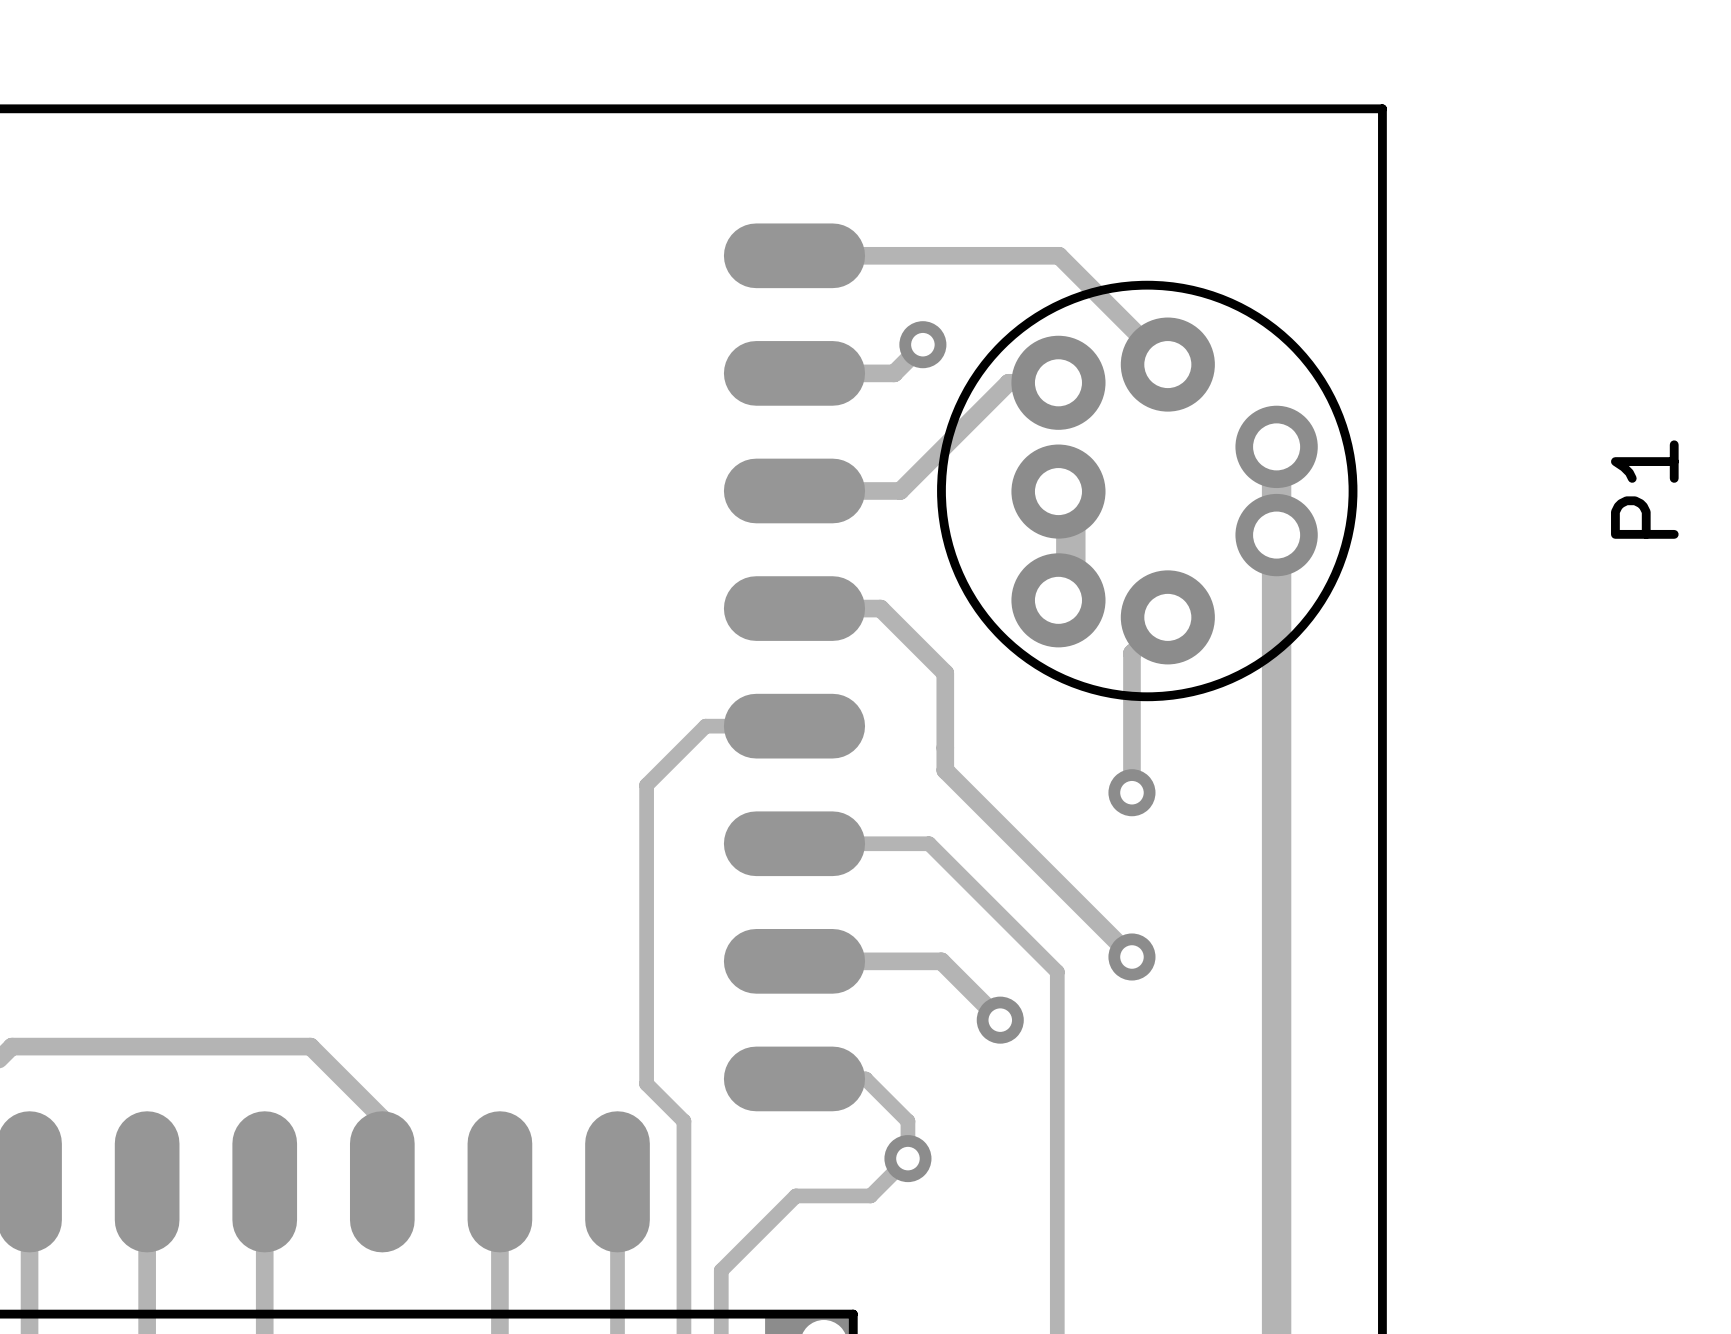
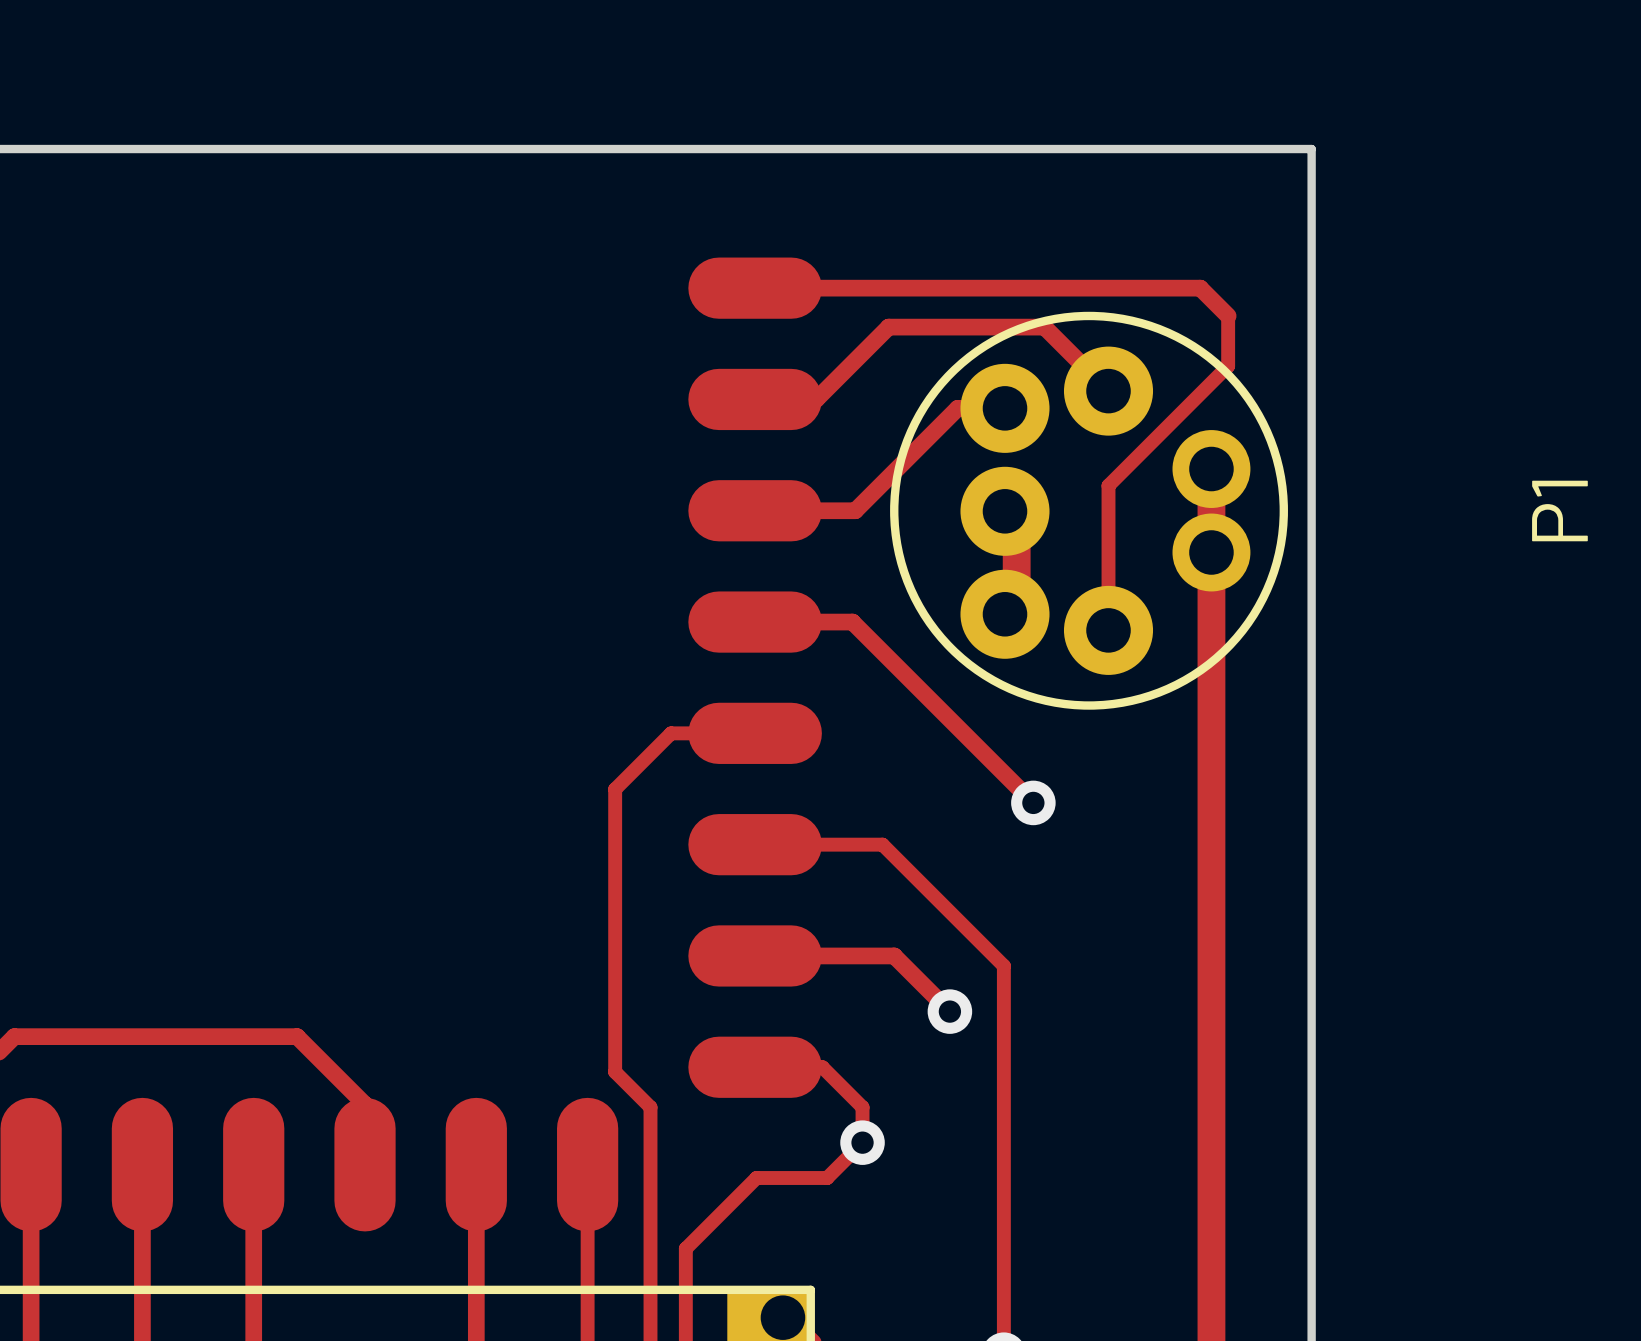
track: (1059, 255) (1100, 296) -> (1005, 288) (1200, 288) (1228, 315) (1228, 366) (1108, 485) (1108, 630)
track: (922, 344) (894, 373) (859, 373) -> (1044, 327) (888, 327) (816, 399)
via: (922, 344) -> none
track: (880, 608) (945, 673) (945, 770) (1131, 956) -> (836, 622) (852, 622) (1033, 802)
track: (1167, 617) (1131, 653) (1131, 792) -> none
via position: (1131, 792) -> (1033, 802)
via: (1131, 956) -> none

